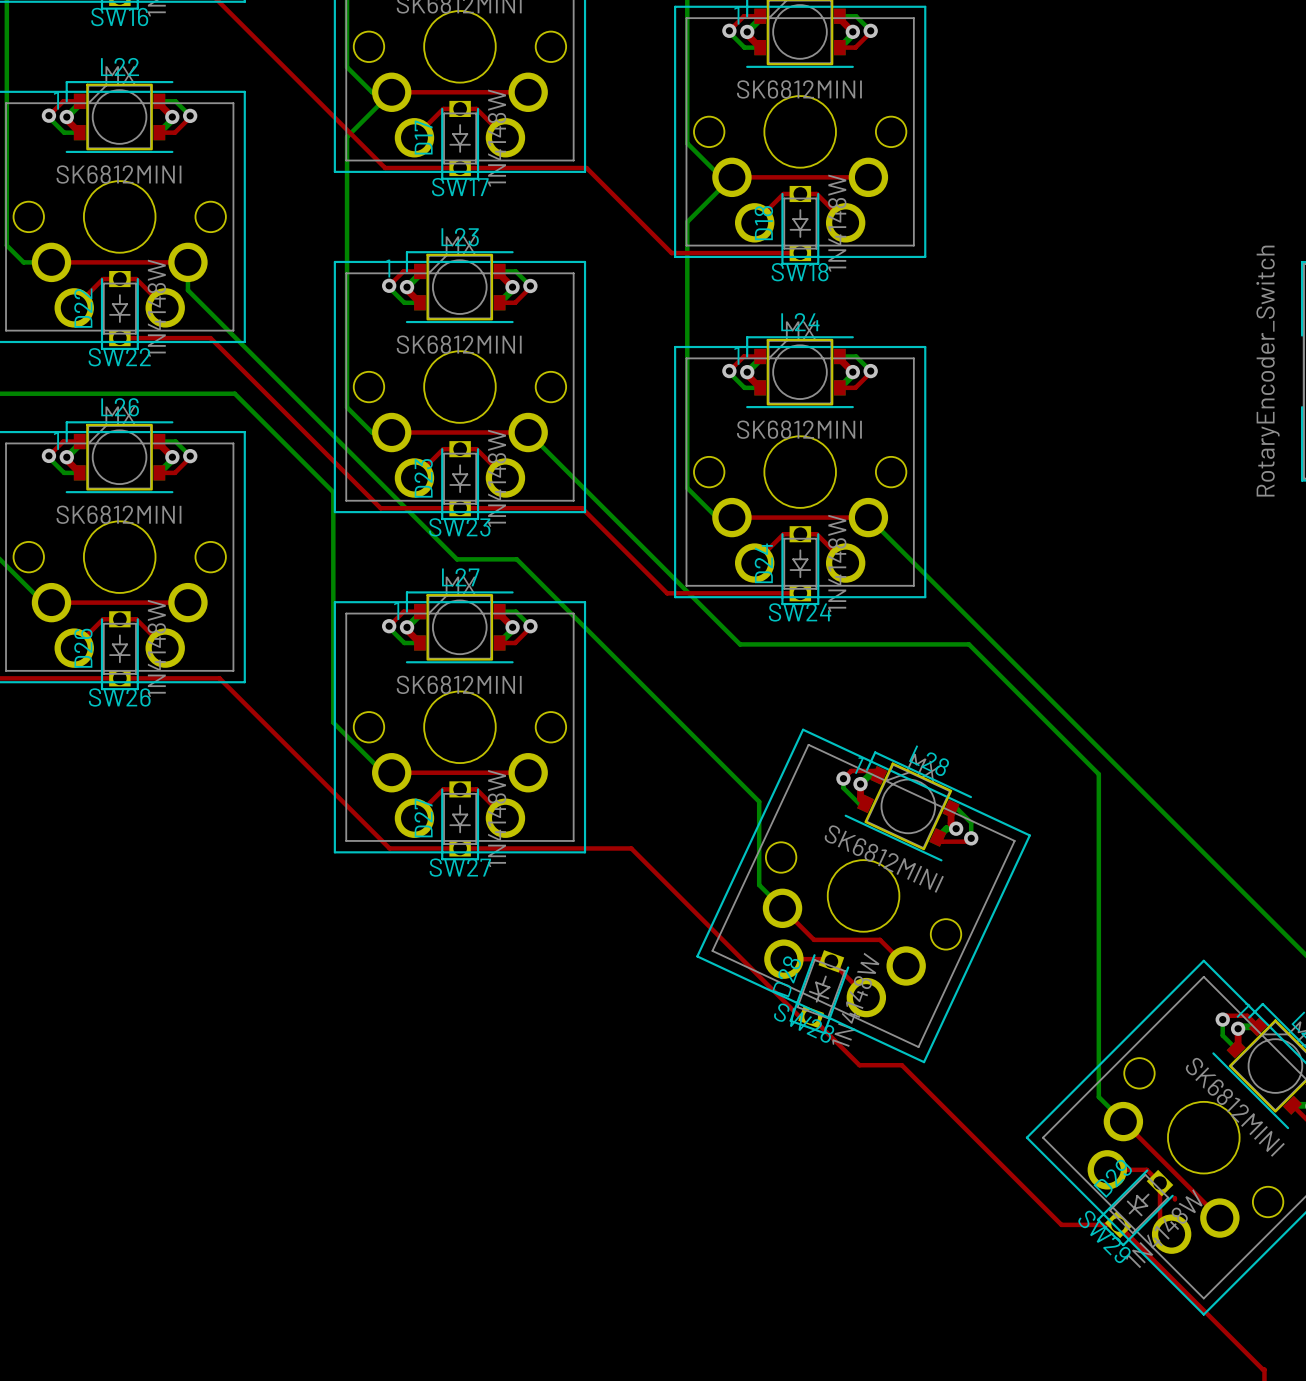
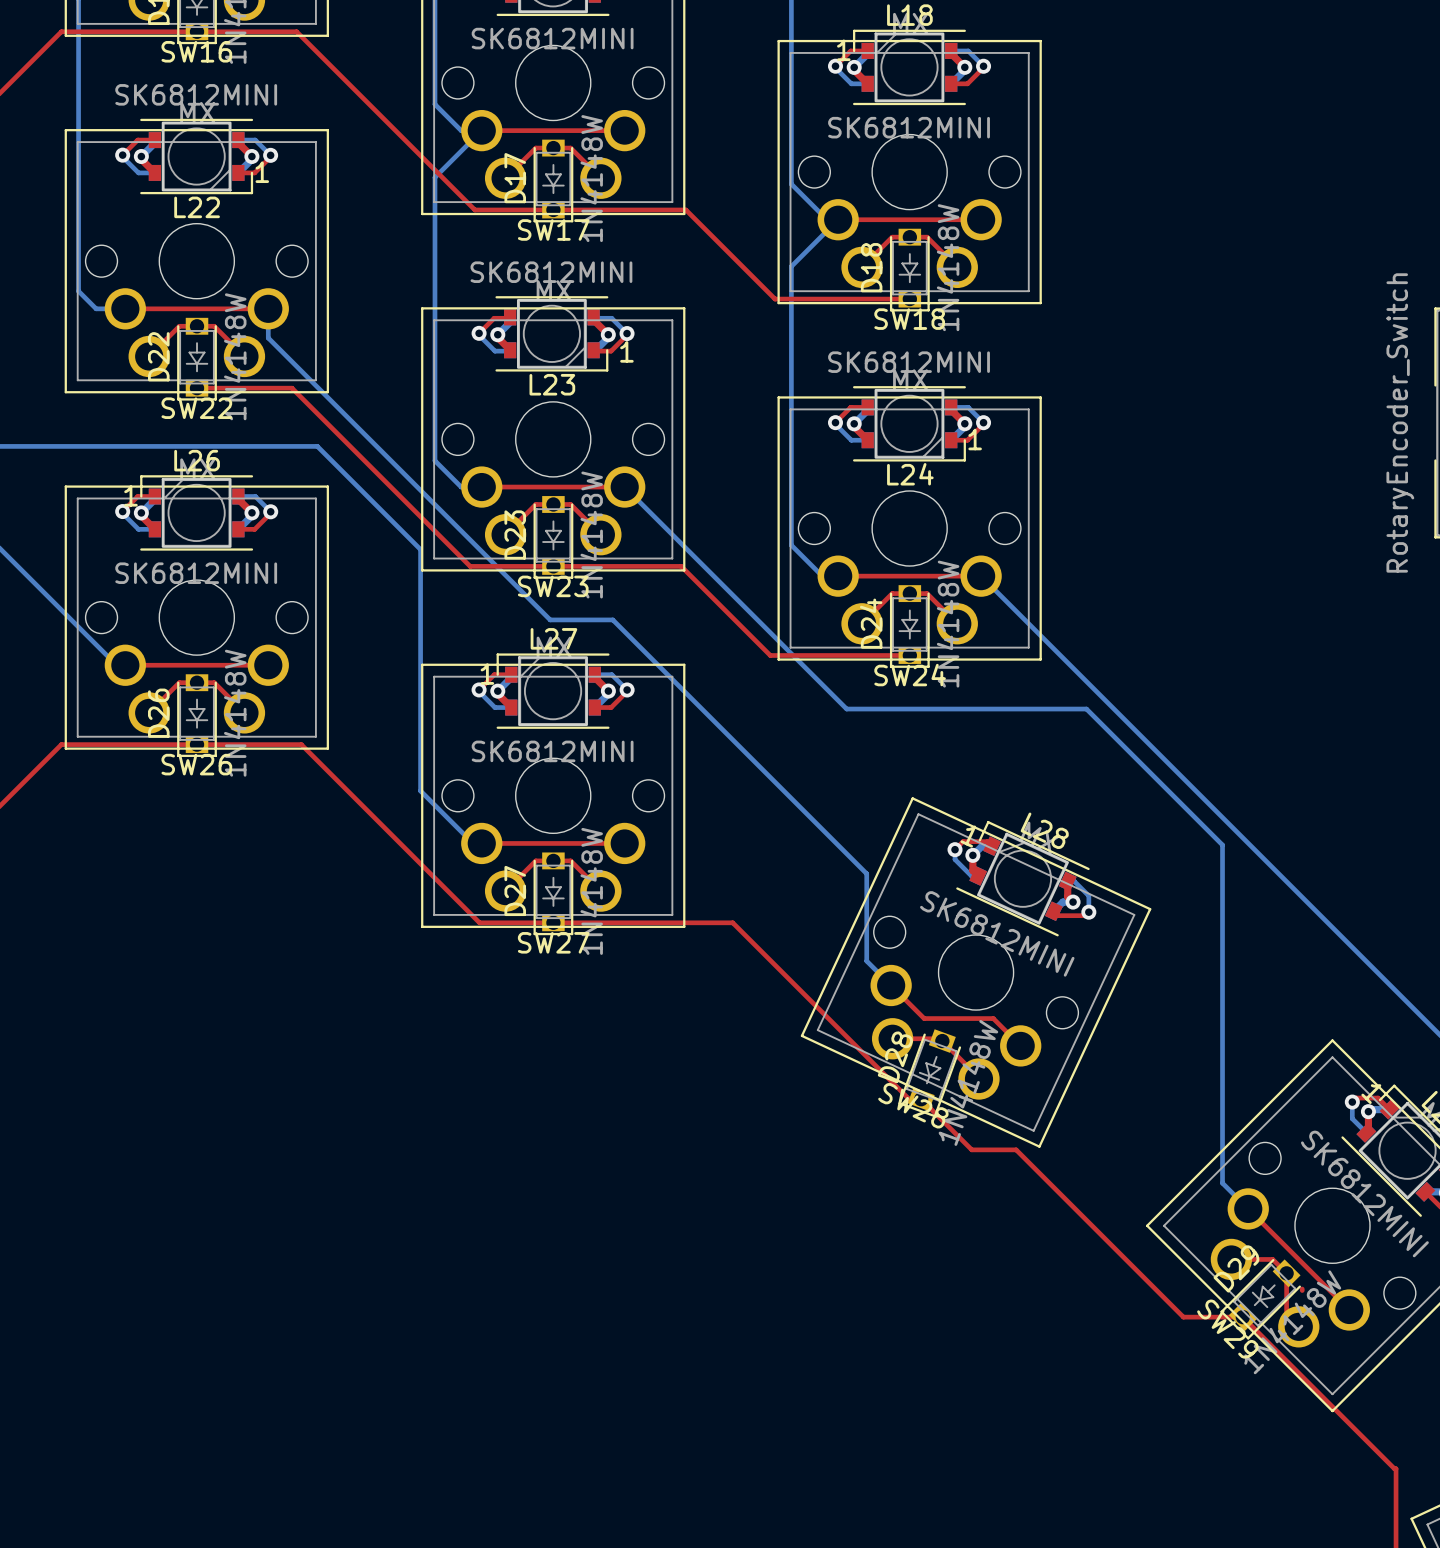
L22 rotation: 0° (119, 117) -> 180° (196, 156)
L23 rotation: 0° (459, 287) -> 180° (551, 333)
L24 rotation: 0° (800, 372) -> 180° (909, 423)

